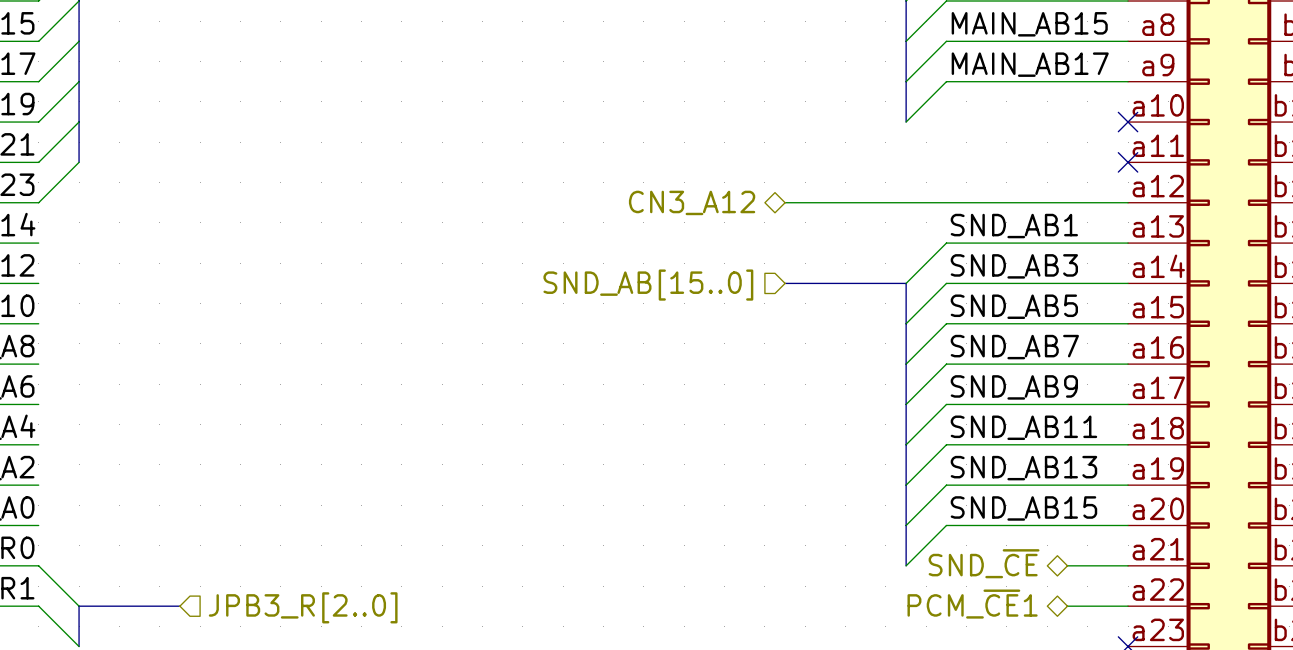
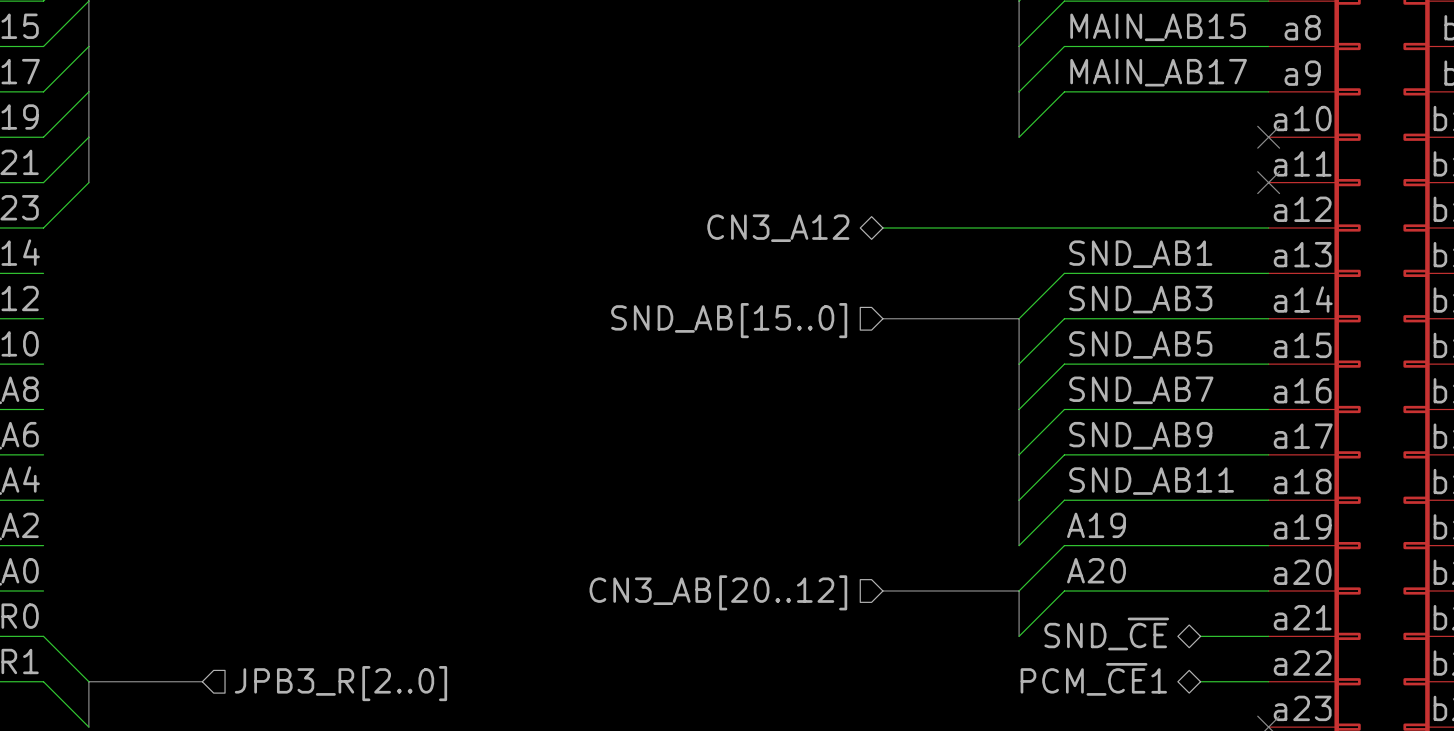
label: SND_AB13 (1023, 468) -> A19 (1096, 525)
bus: (906, 485) (906, 525) -> (882, 590) (1019, 590)
label: SND_AB15 (1023, 508) -> A20 (1096, 570)
hierarchical label: none -> CN3_AB[20..12] (718, 592)

